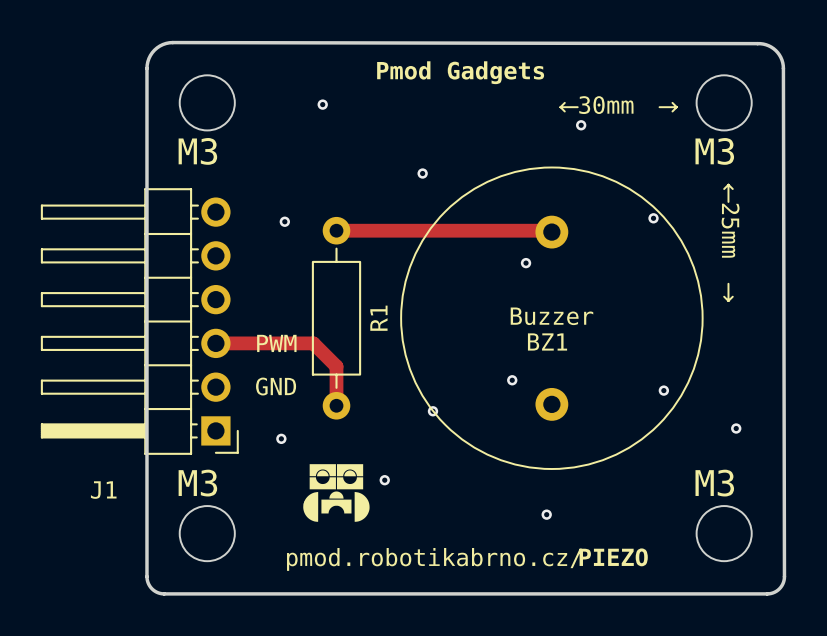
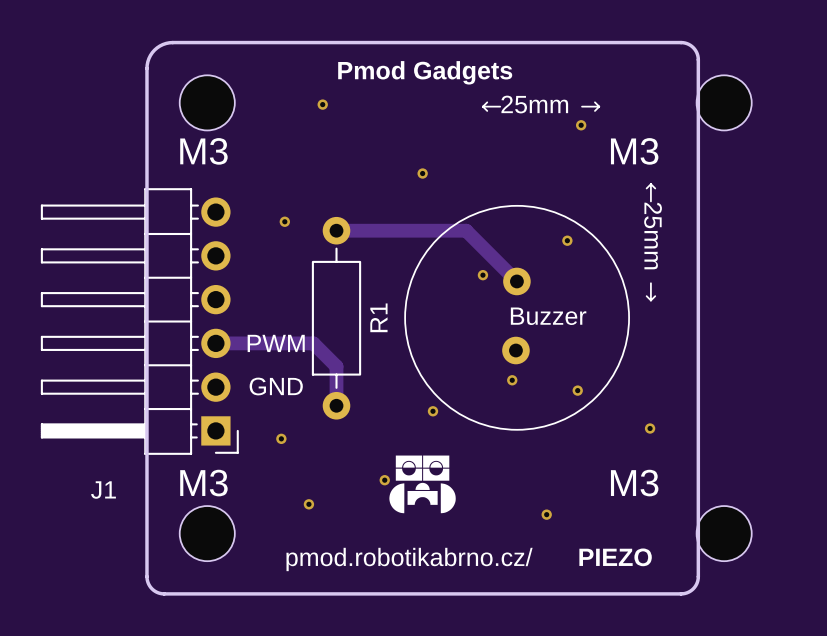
board edge: (172, 42) (757, 43) (768, 45) (777, 52) (783, 68) (784, 580) (777, 590) (769, 593) (681, 593) -> (172, 42) (681, 42) (693, 47) (698, 59) (698, 576) (693, 588) (681, 593)
text position: Pmod Gadgets (460, 72) -> Pmod Gadgets (425, 72)
line: (564, 102) (560, 107) -> (487, 102) (482, 106)
line: (672, 102) (676, 107) -> (594, 102) (599, 106)
text: none -> 25mm (534, 104)
text: 30mm (606, 105) -> none
line: (560, 107) (577, 107) -> (482, 106) (500, 106)
line: (560, 107) (564, 111) -> (482, 106) (487, 110)
line: (659, 107) (676, 107) -> (582, 106) (599, 106)
line: (676, 107) (672, 111) -> (599, 106) (594, 110)
text position: M3 (714, 151) -> M3 (634, 151)
line: (728, 184) (728, 201) -> (650, 184) (650, 201)
line: (728, 184) (724, 189) -> (650, 184) (646, 188)
line: (728, 184) (732, 189) -> (650, 184) (655, 188)
via: (653, 218) -> none
track: (466, 230) (551, 232) -> (466, 230) (516, 281)
text position: 25mm (730, 230) -> 25mm (653, 235)
via: none -> (567, 240)
via: (526, 263) -> none
via: none -> (482, 275)
line: (728, 283) (728, 301) -> (650, 283) (650, 300)
line: (724, 296) (728, 301) -> (646, 296) (650, 300)
line: (732, 296) (728, 301) -> (655, 296) (650, 300)
part: none -> (517, 317)
part: (551, 318) -> none
via: none -> (577, 390)
via position: (663, 390) -> (650, 428)
via: (736, 428) -> none
text position: M3 (714, 483) -> M3 (634, 483)
drawing position: (336, 492) -> (422, 484)

